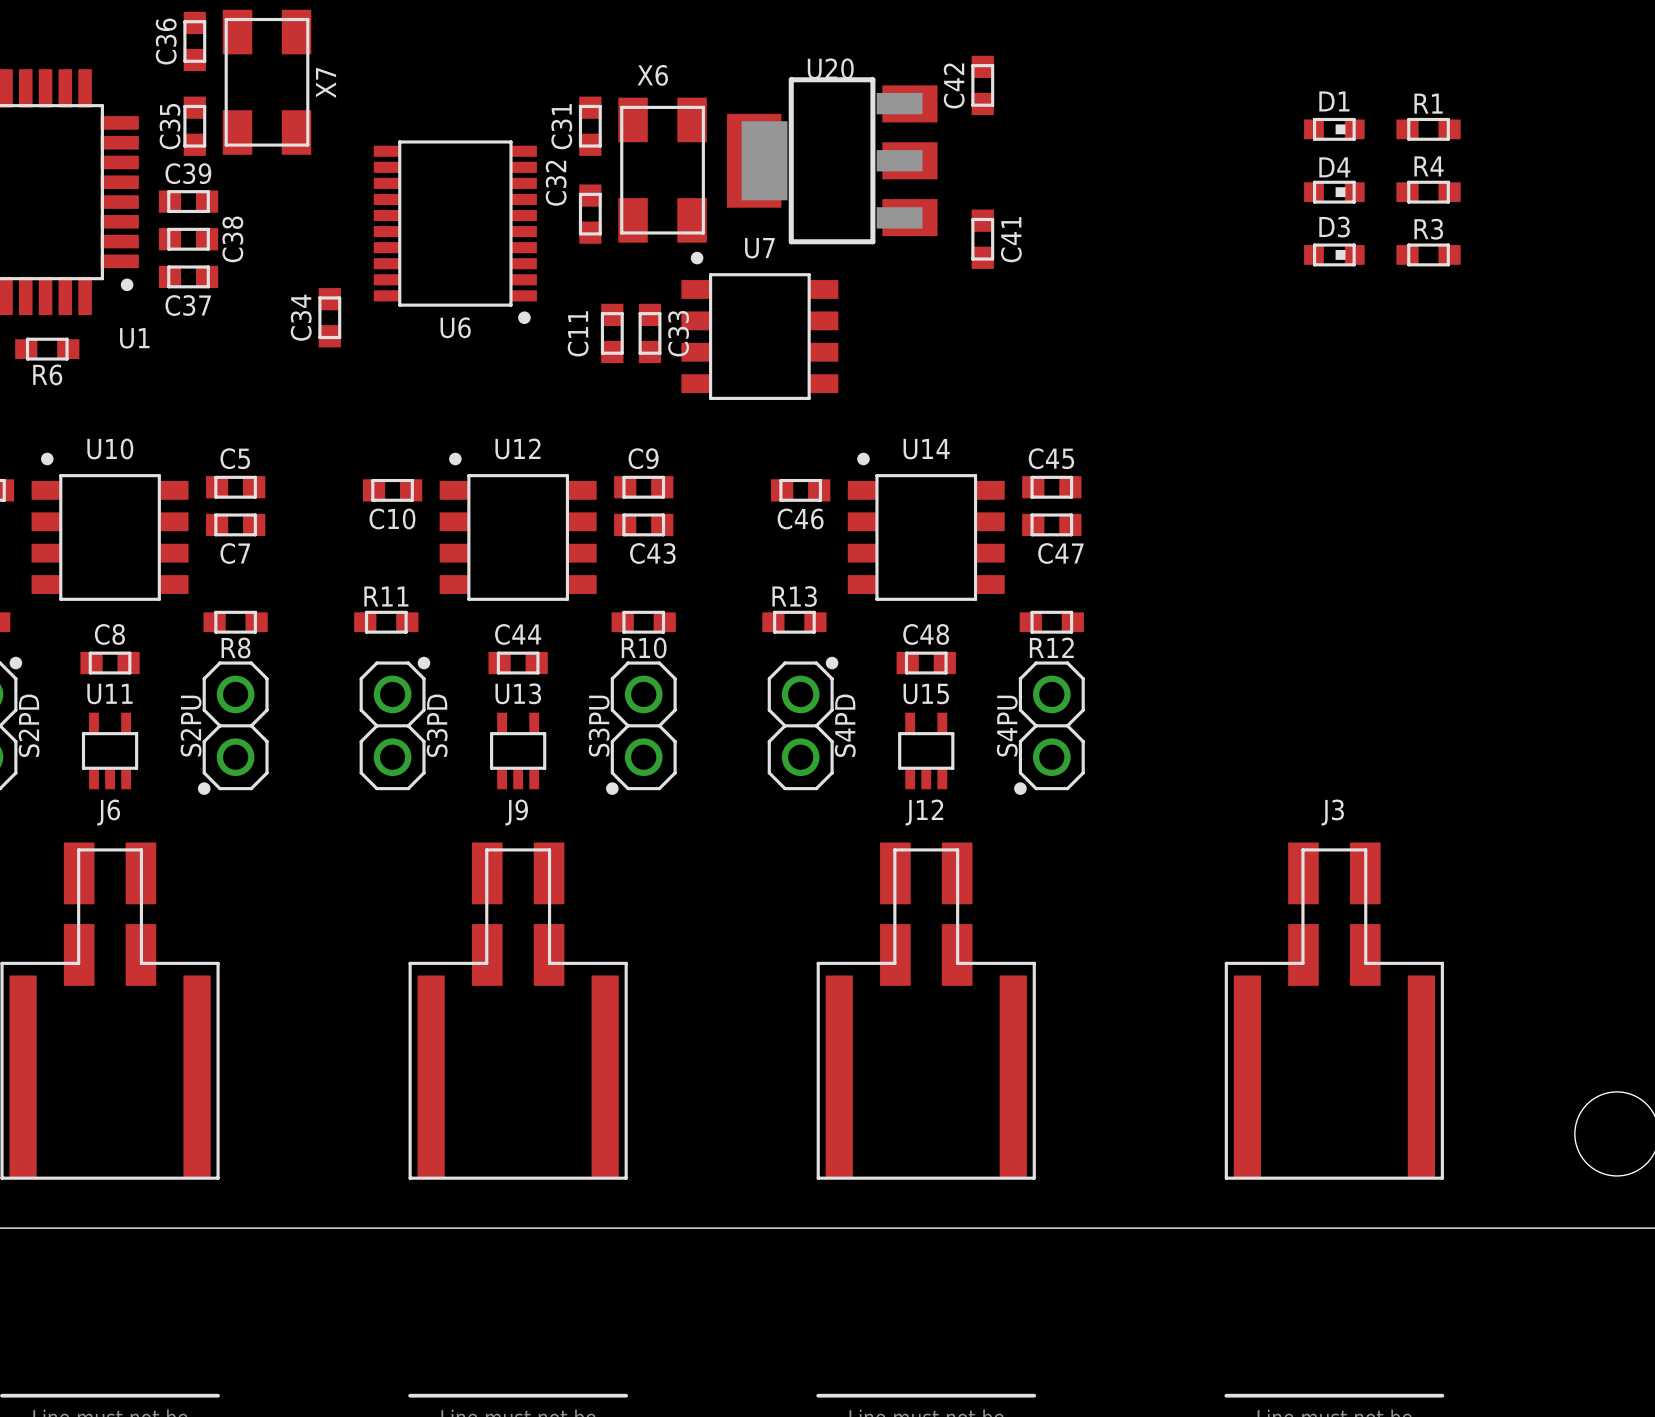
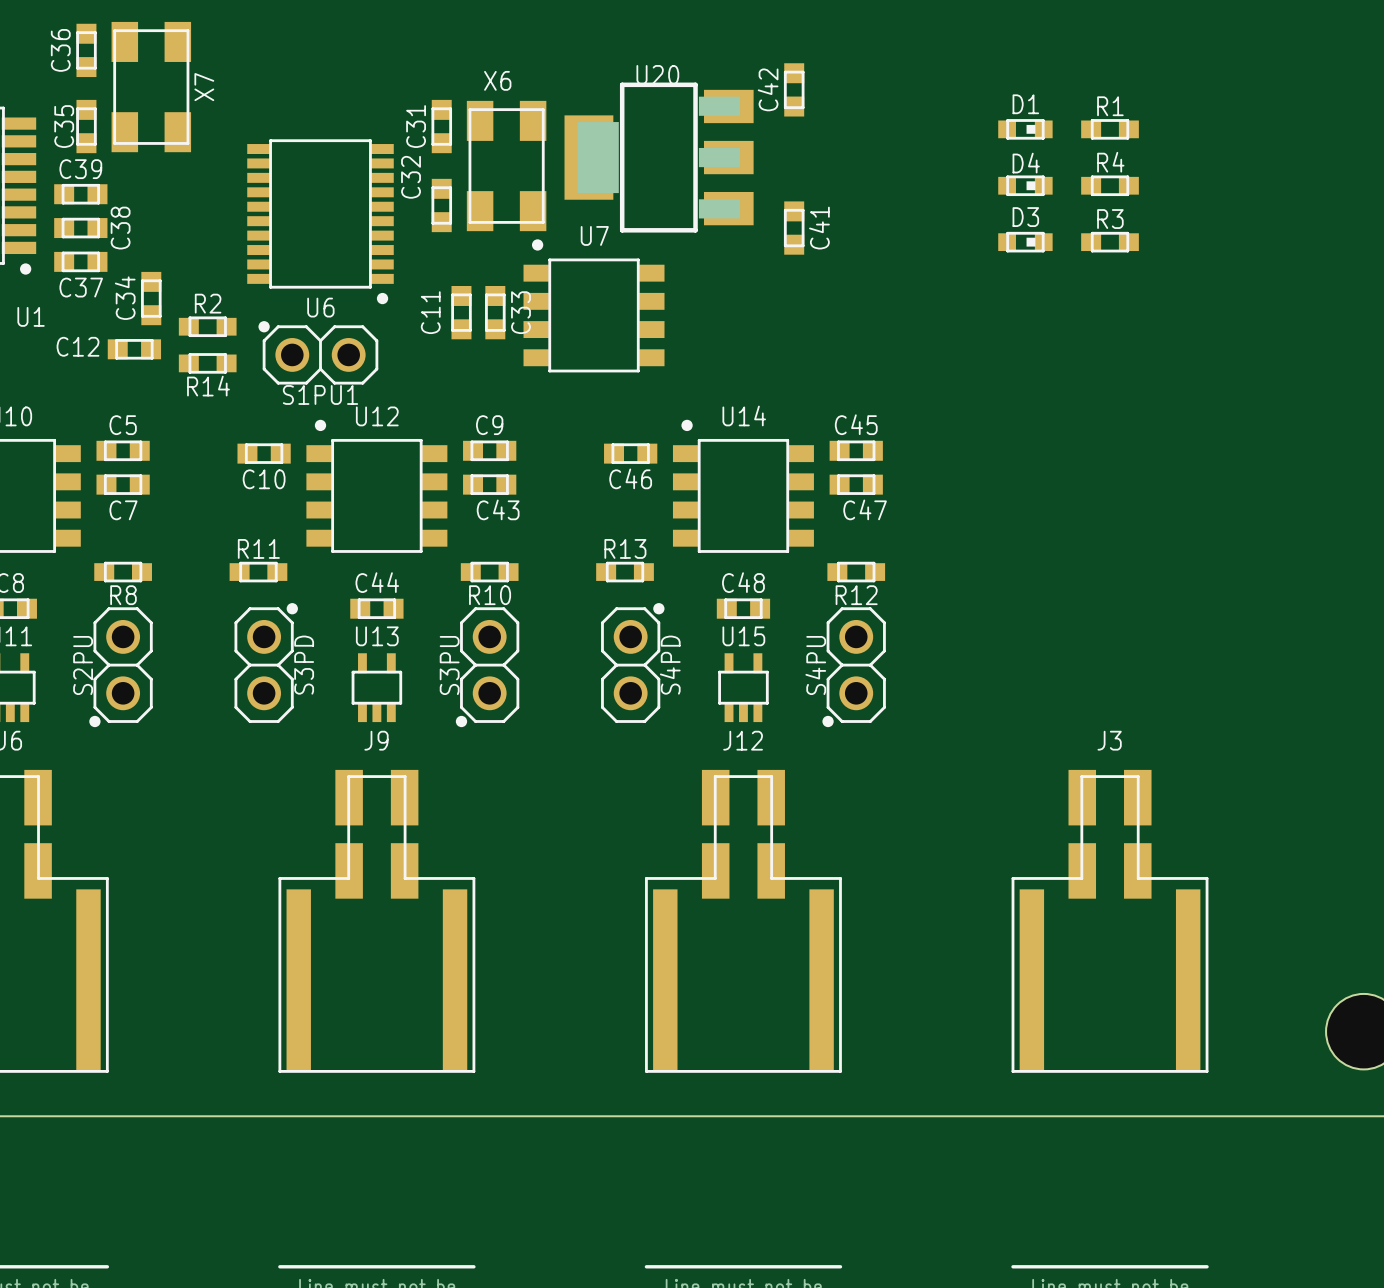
D1 position: (1334, 129) -> (1025, 129)
R1 position: (1428, 129) -> (1110, 129)
D4 position: (1334, 192) -> (1025, 185)
R4 position: (1428, 192) -> (1110, 185)
D3 position: (1334, 254) -> (1025, 242)
R3 position: (1428, 254) -> (1110, 242)
C34 position: (329, 317) -> (151, 298)
R2: none -> (207, 326)
C12: none -> (134, 349)
S1PU1: none -> (318, 352)
R14: none -> (207, 363)

